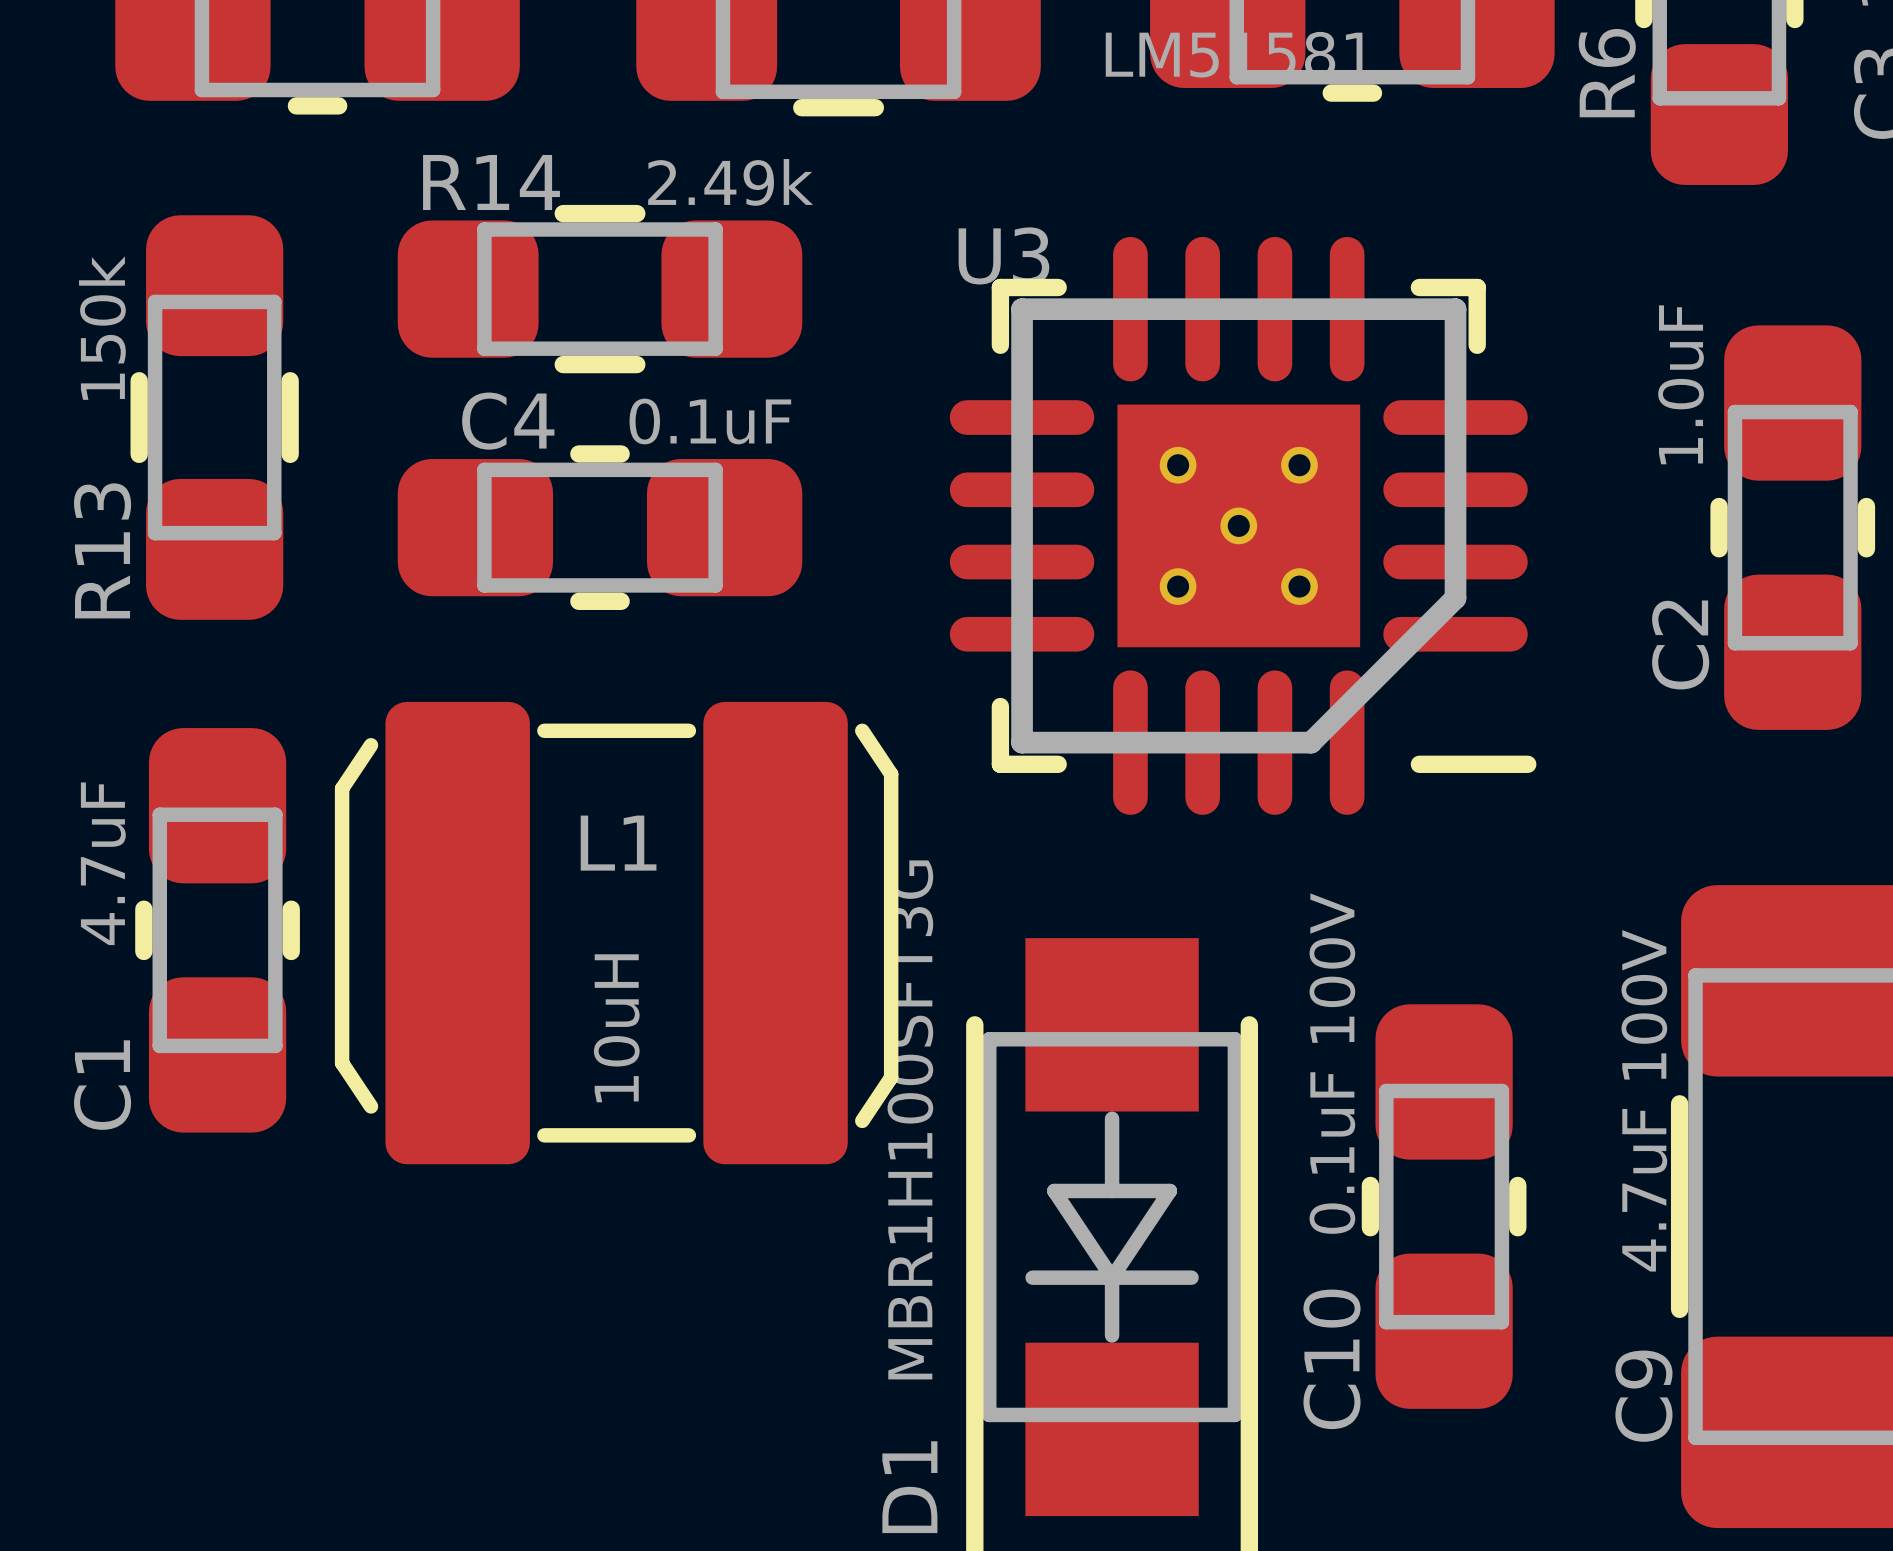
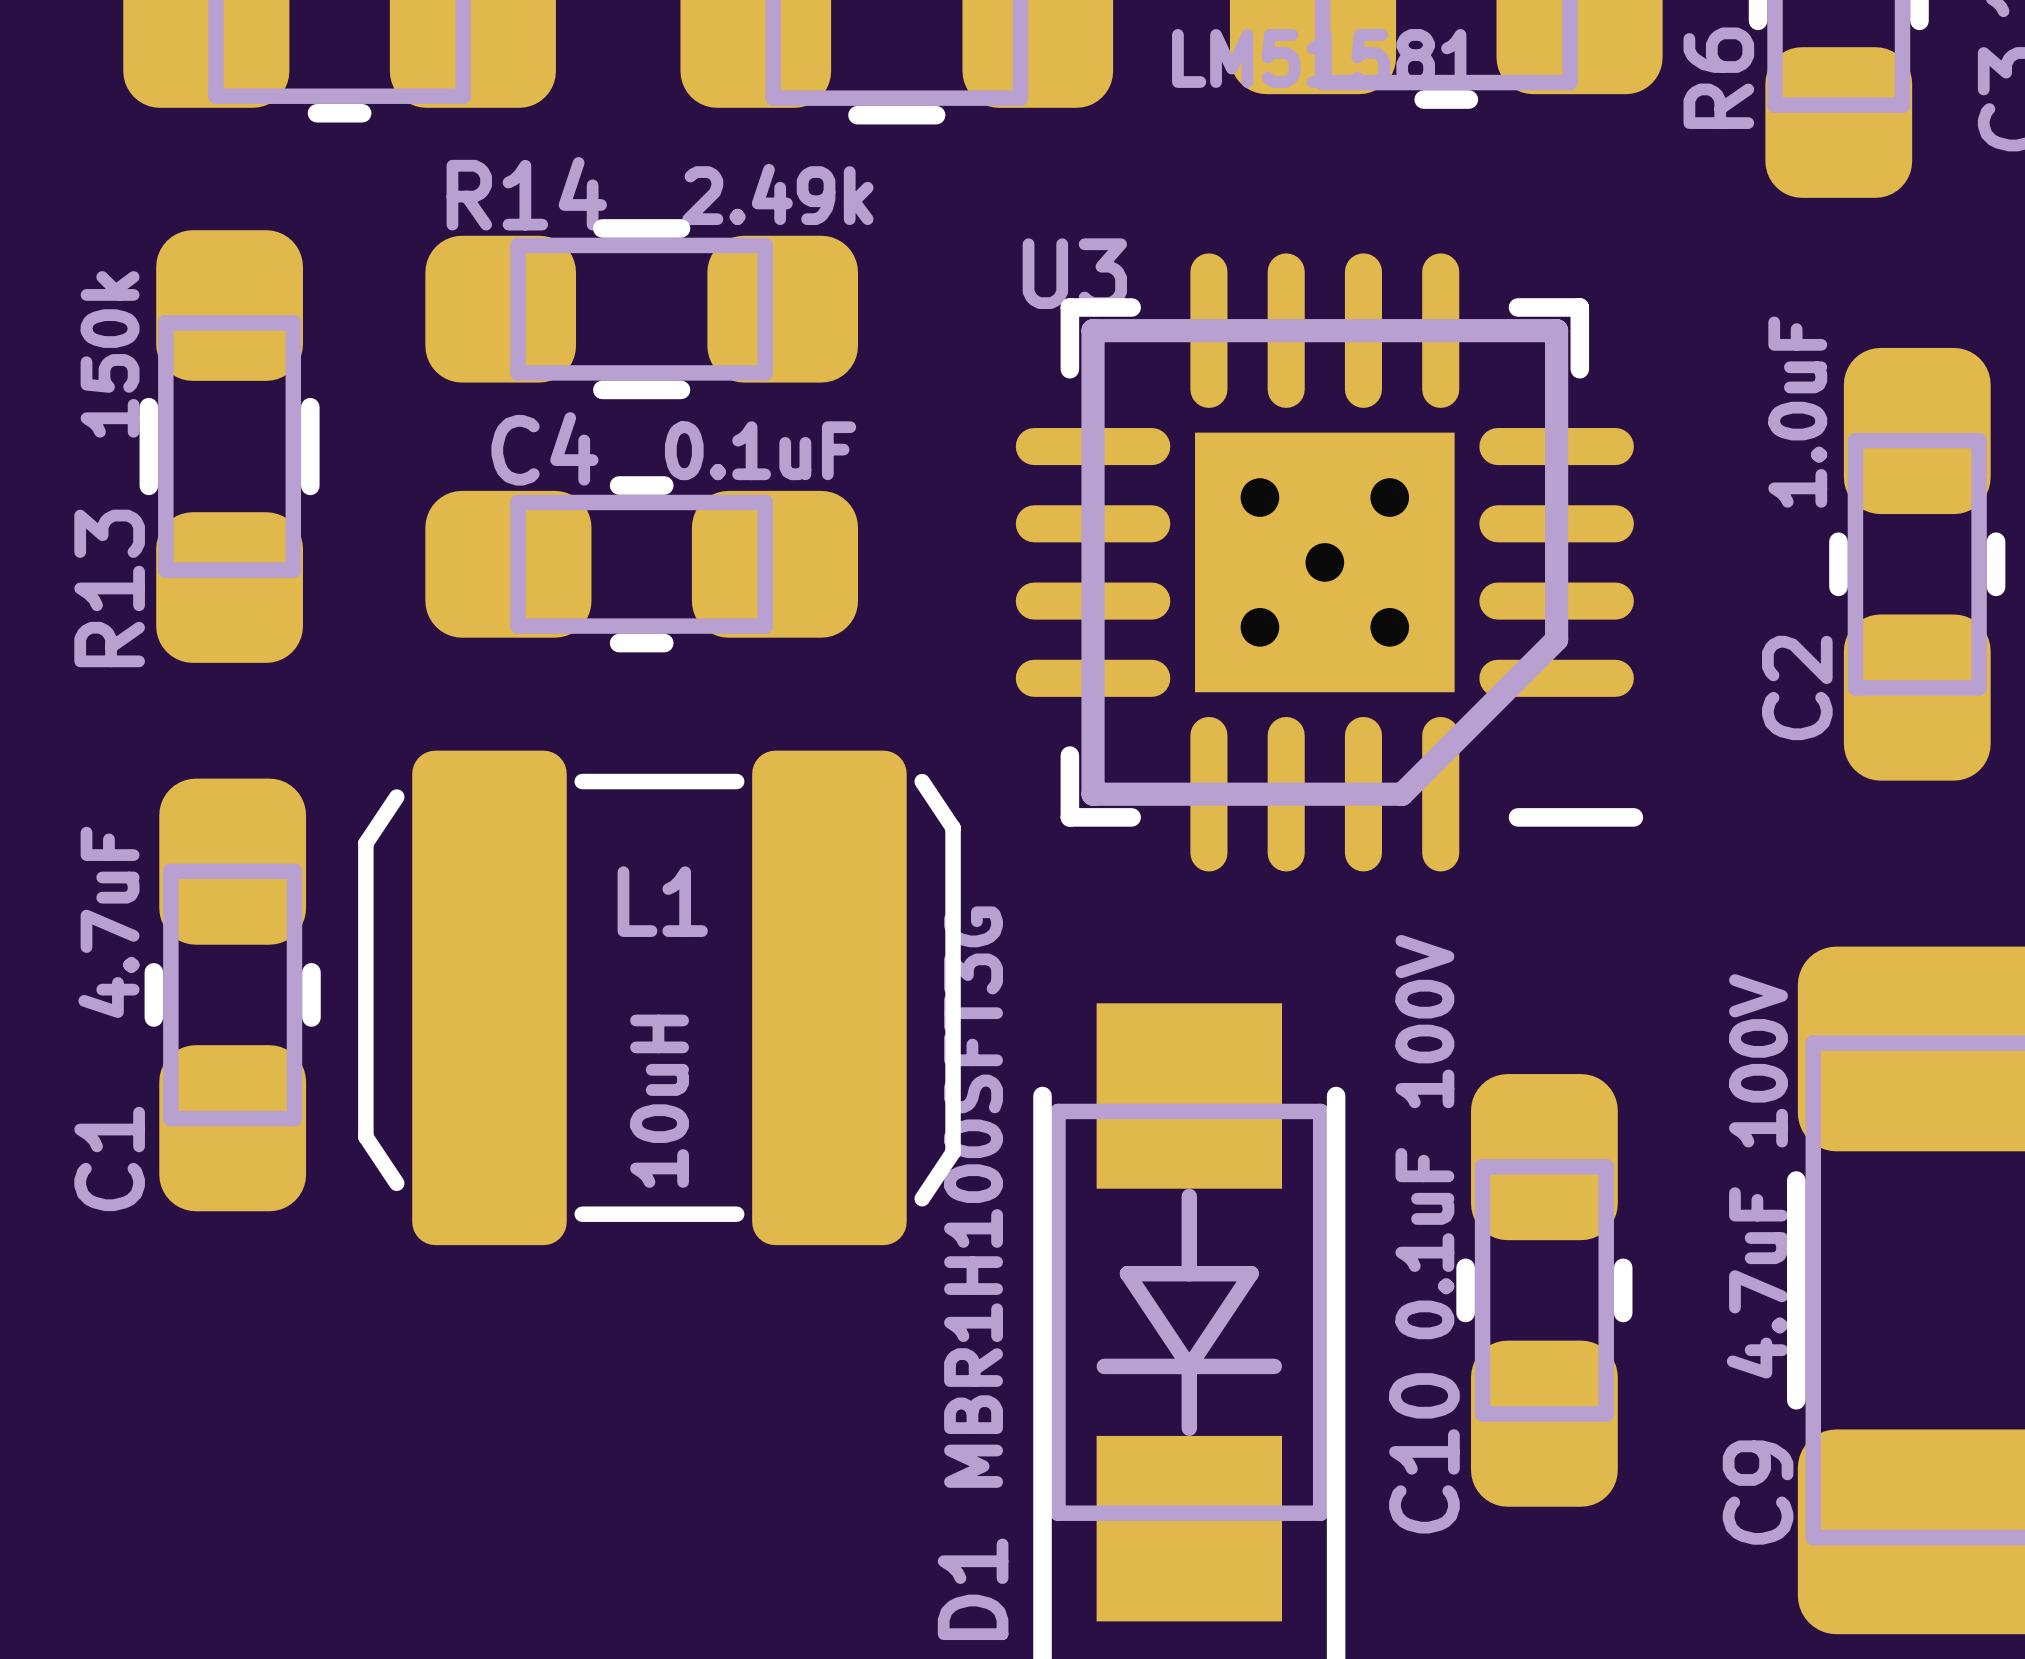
U3 footprint: [949, 236, 1537, 815] -> [1015, 253, 1644, 872]

